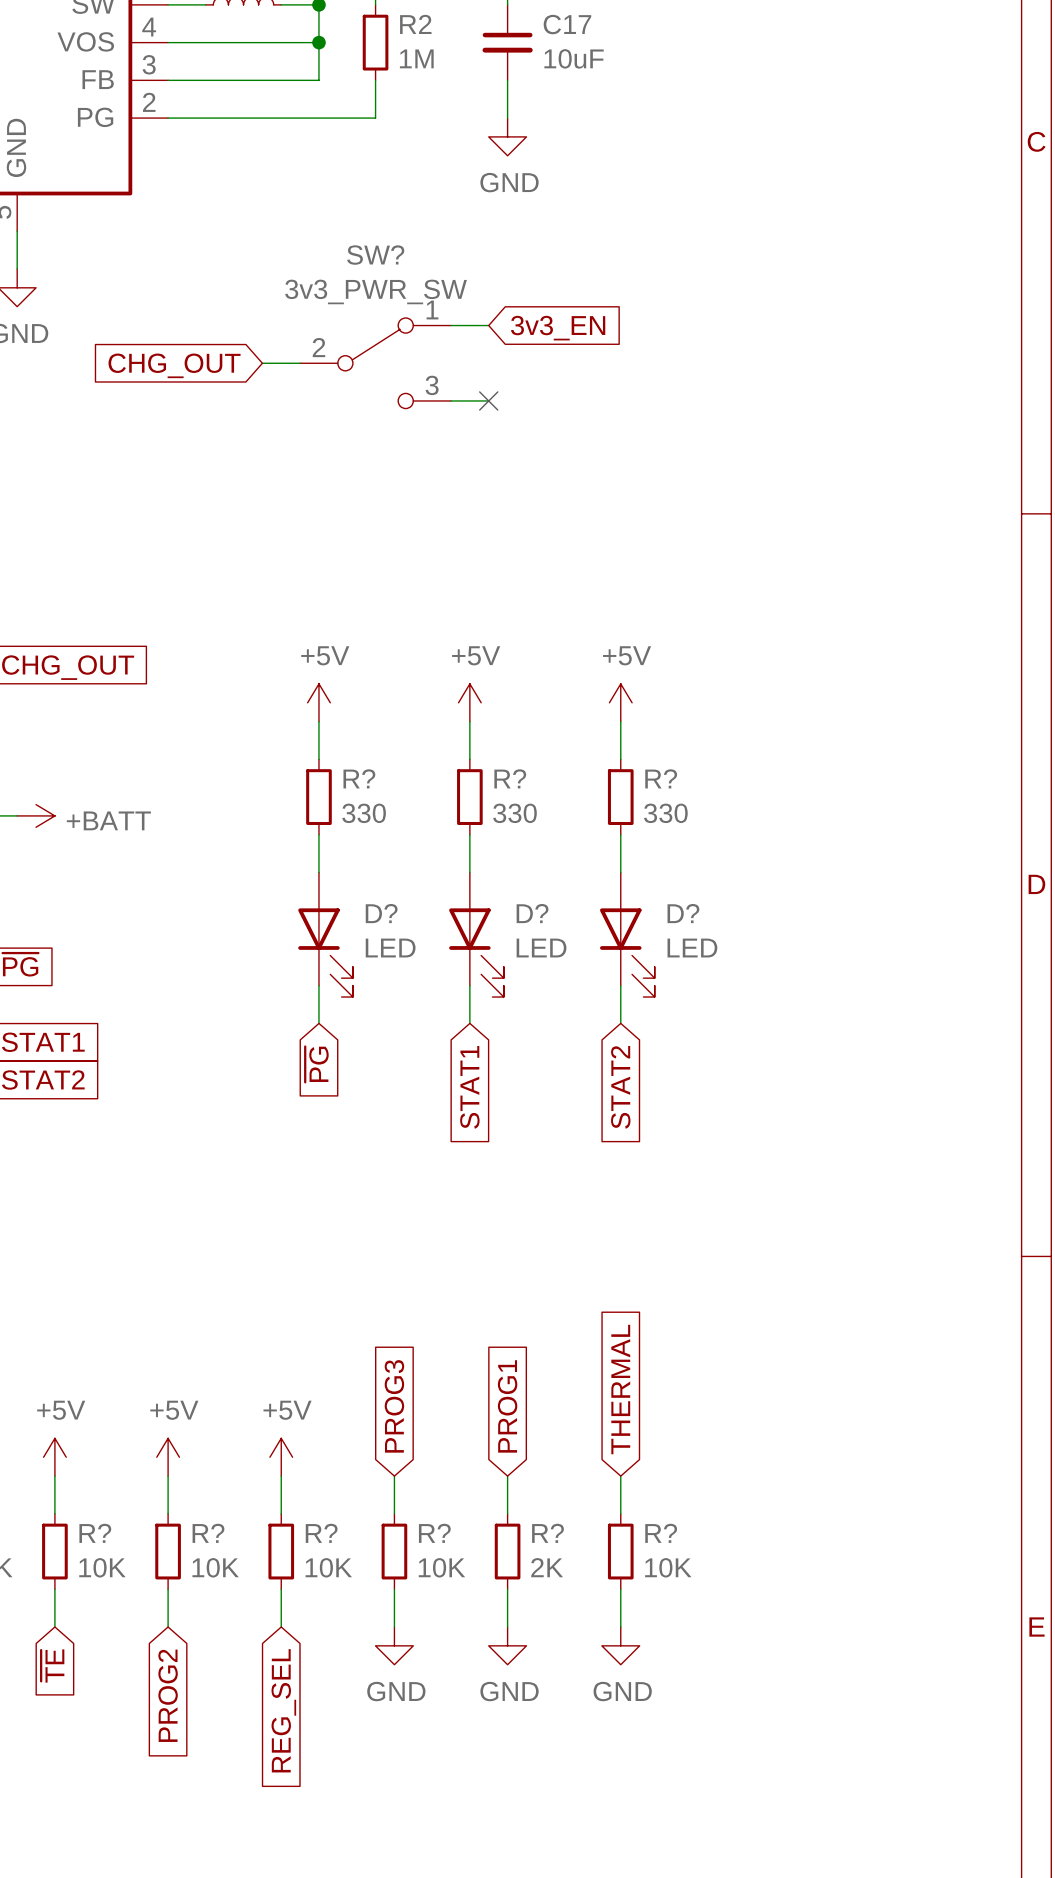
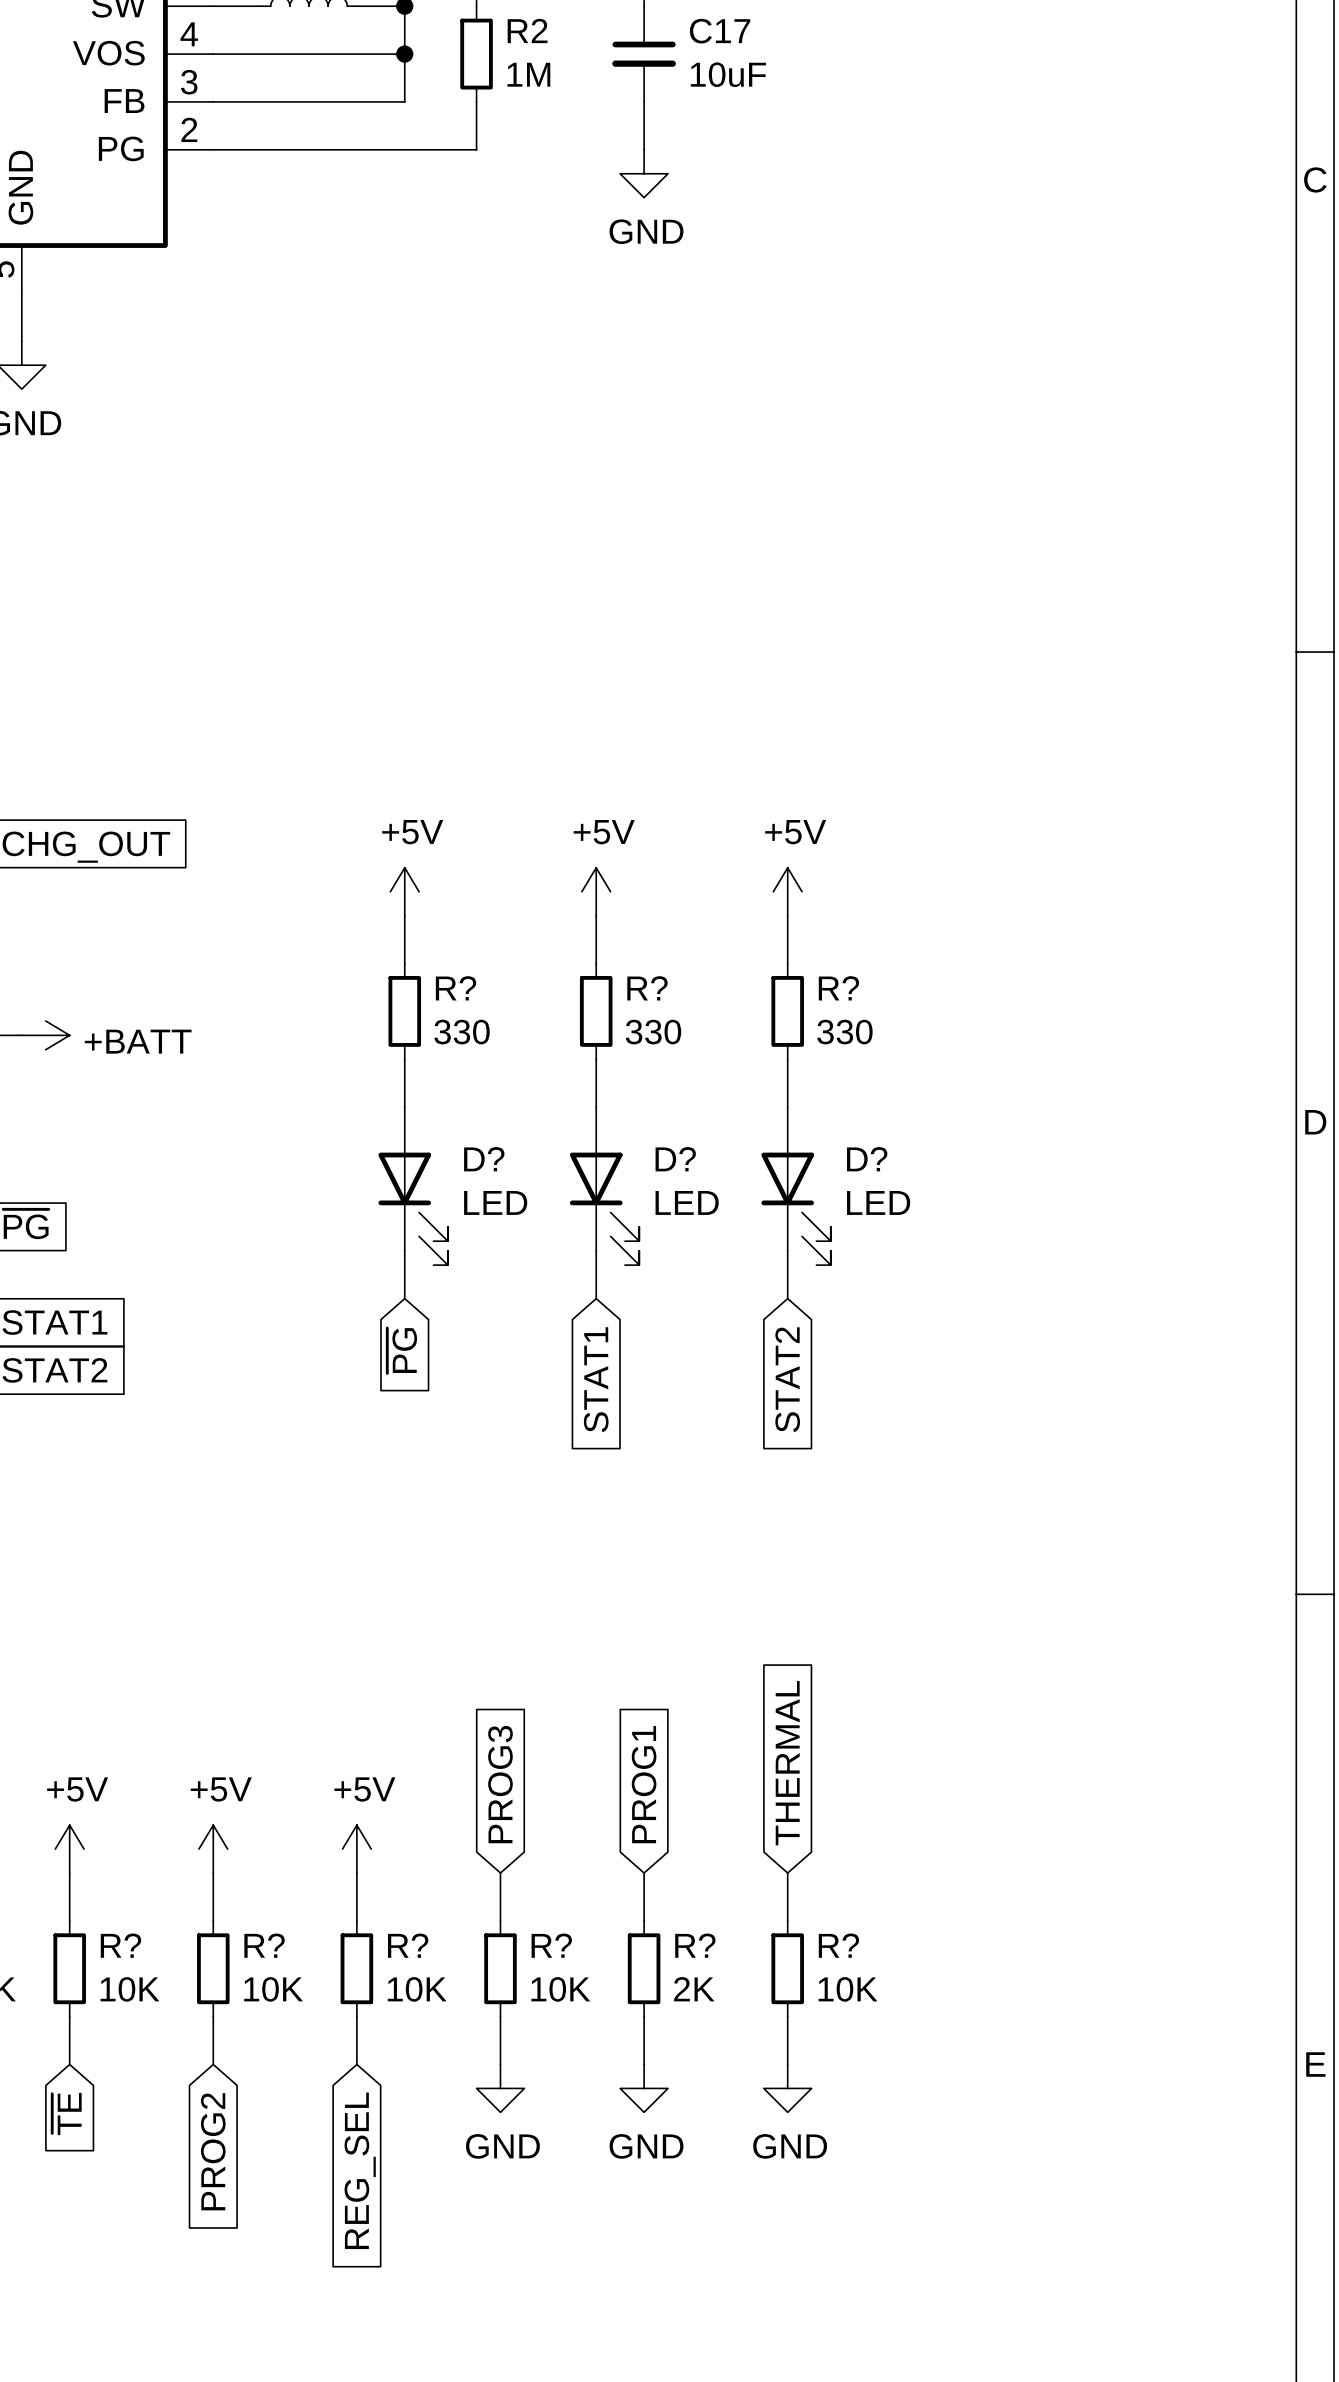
wire: (451, 325) (488, 325) -> none
global label: 3v3_EN (558, 328) -> none
wire: (262, 363) (300, 363) -> none
SW?: 3v3_PWR_SW (375, 363) -> none
global label: CHG_OUT (174, 365) -> none
wire: (451, 400) (488, 400) -> none
no-connect mark: (488, 400) -> none

